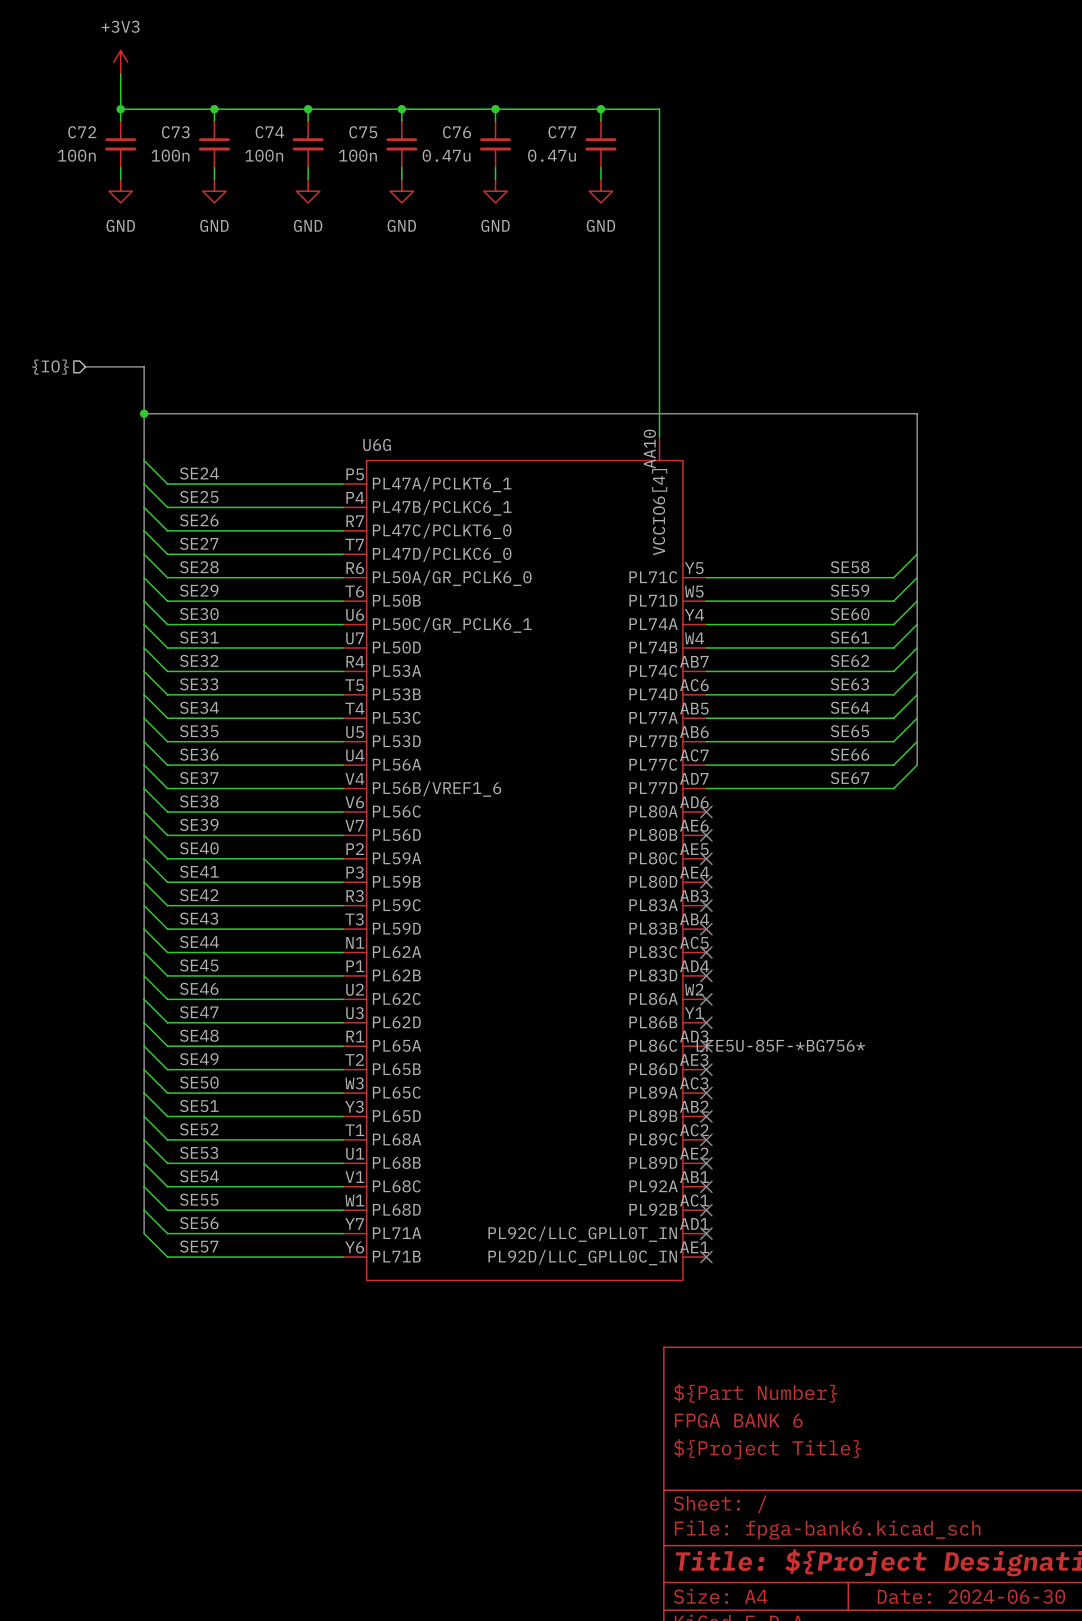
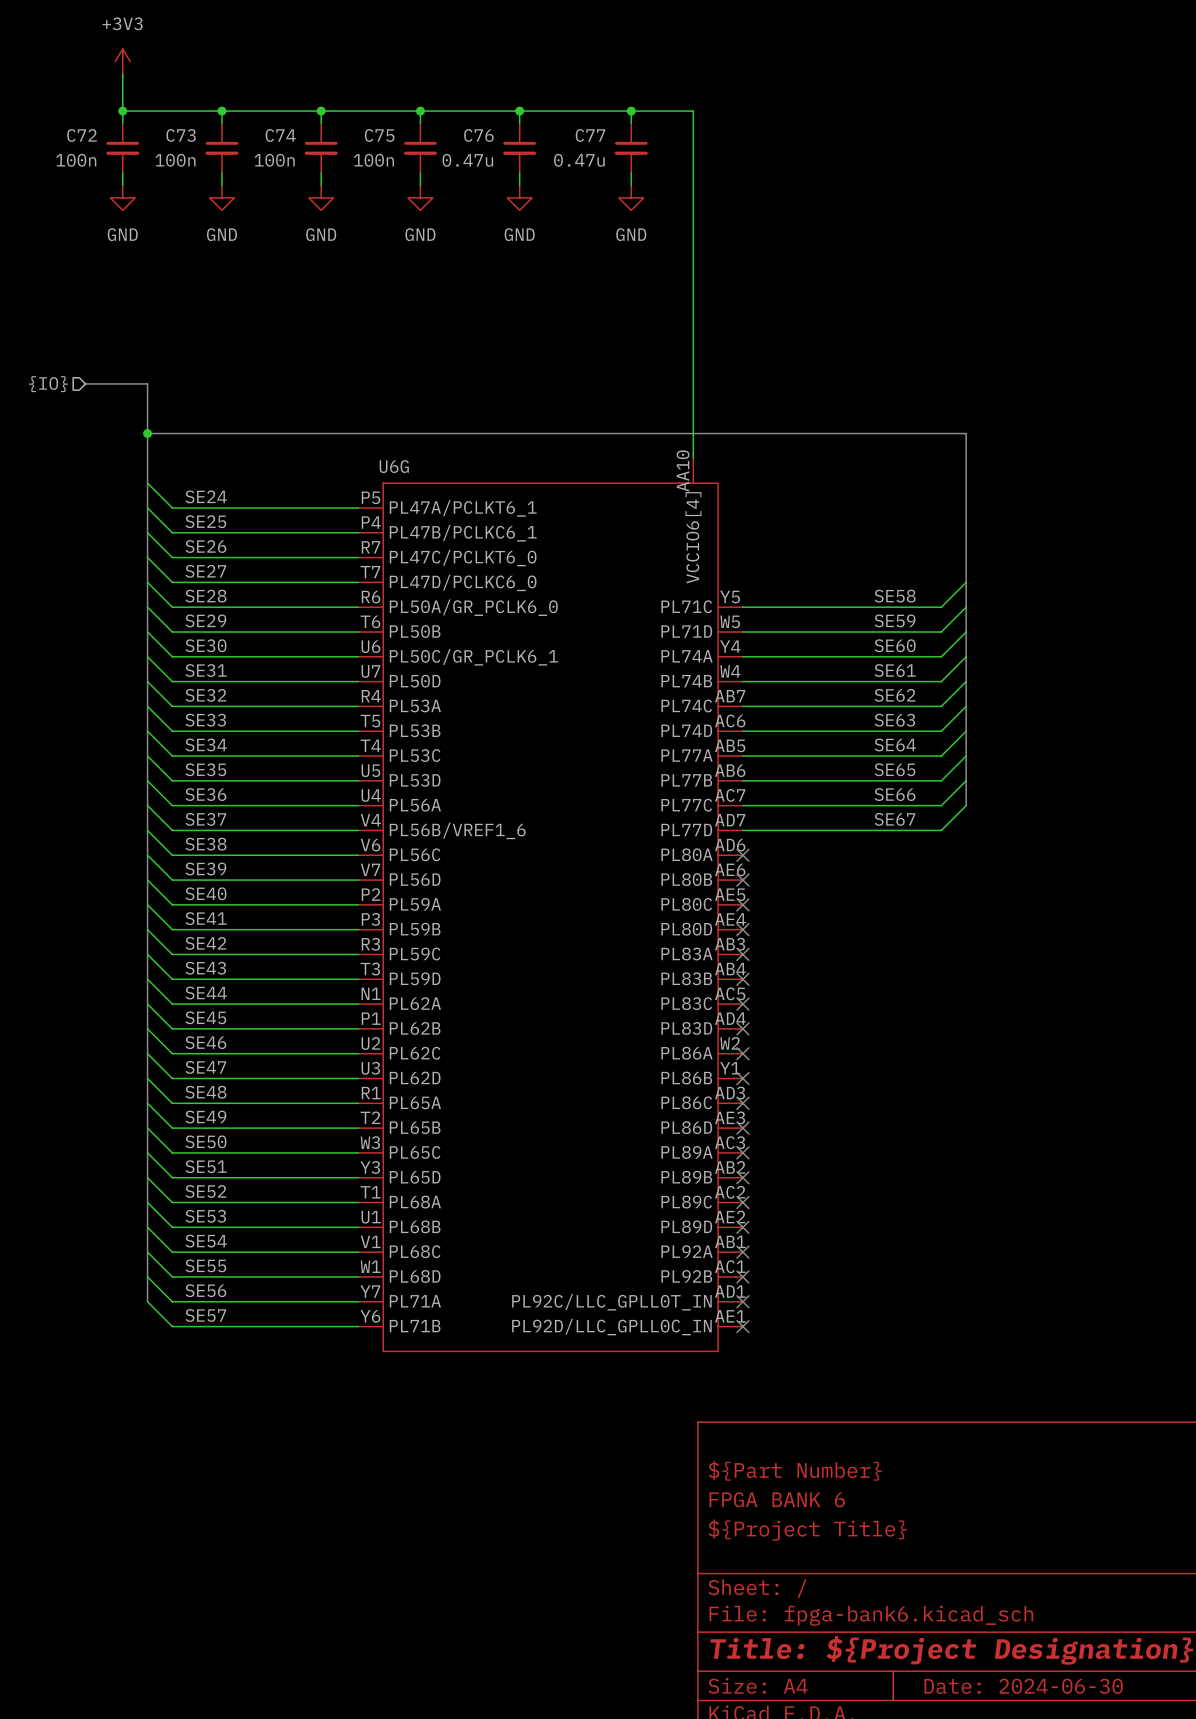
U6G value: LFE5U-85F-*BG756* (780, 1045) -> none

